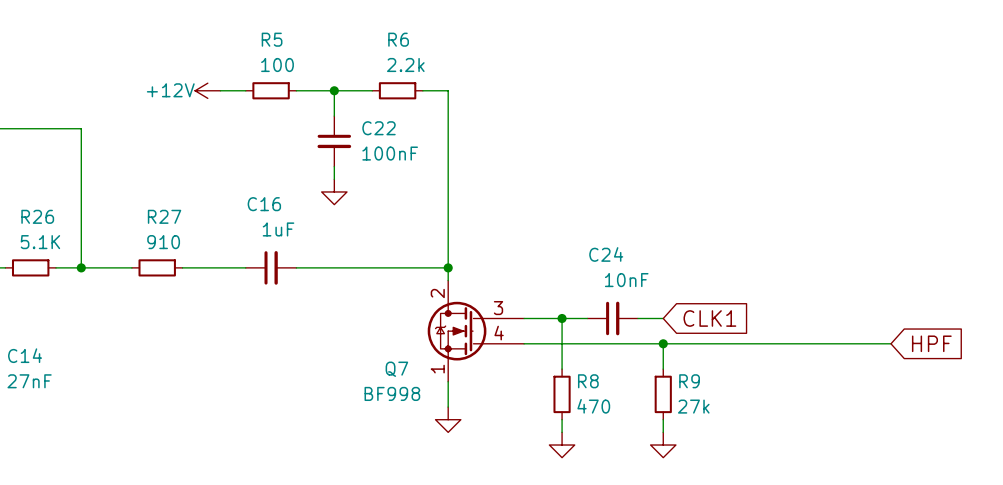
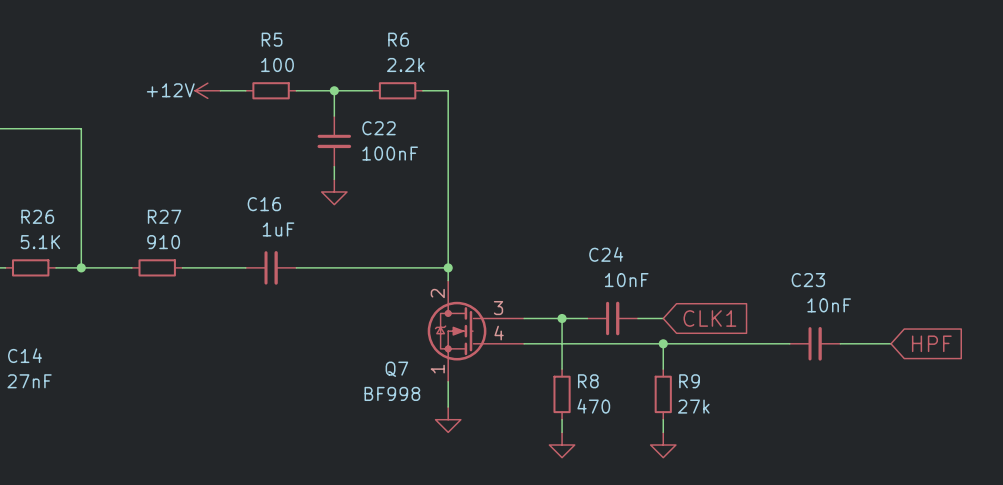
C23: none -> 10nF (815, 343)

